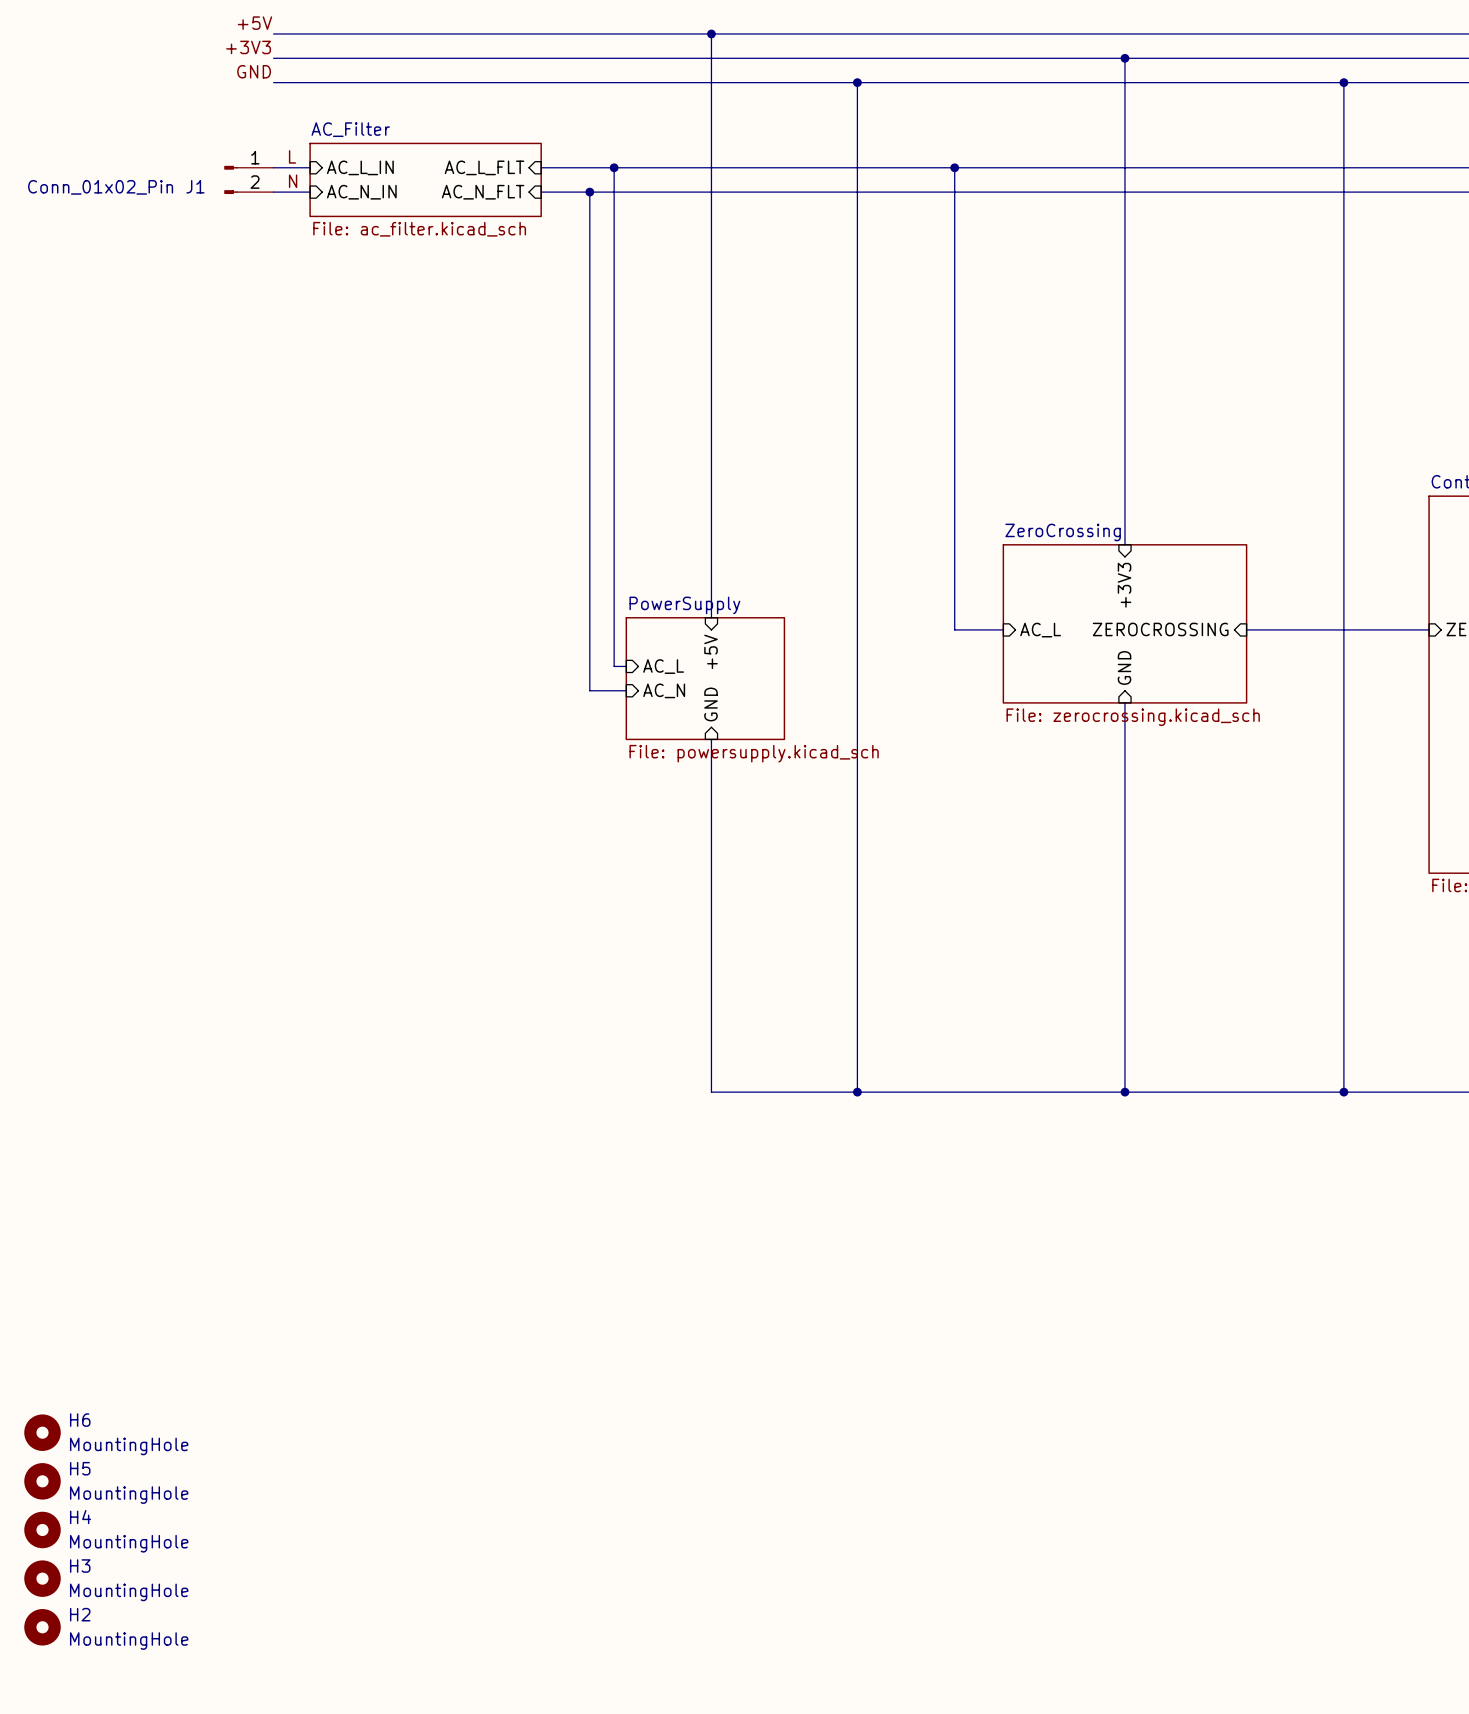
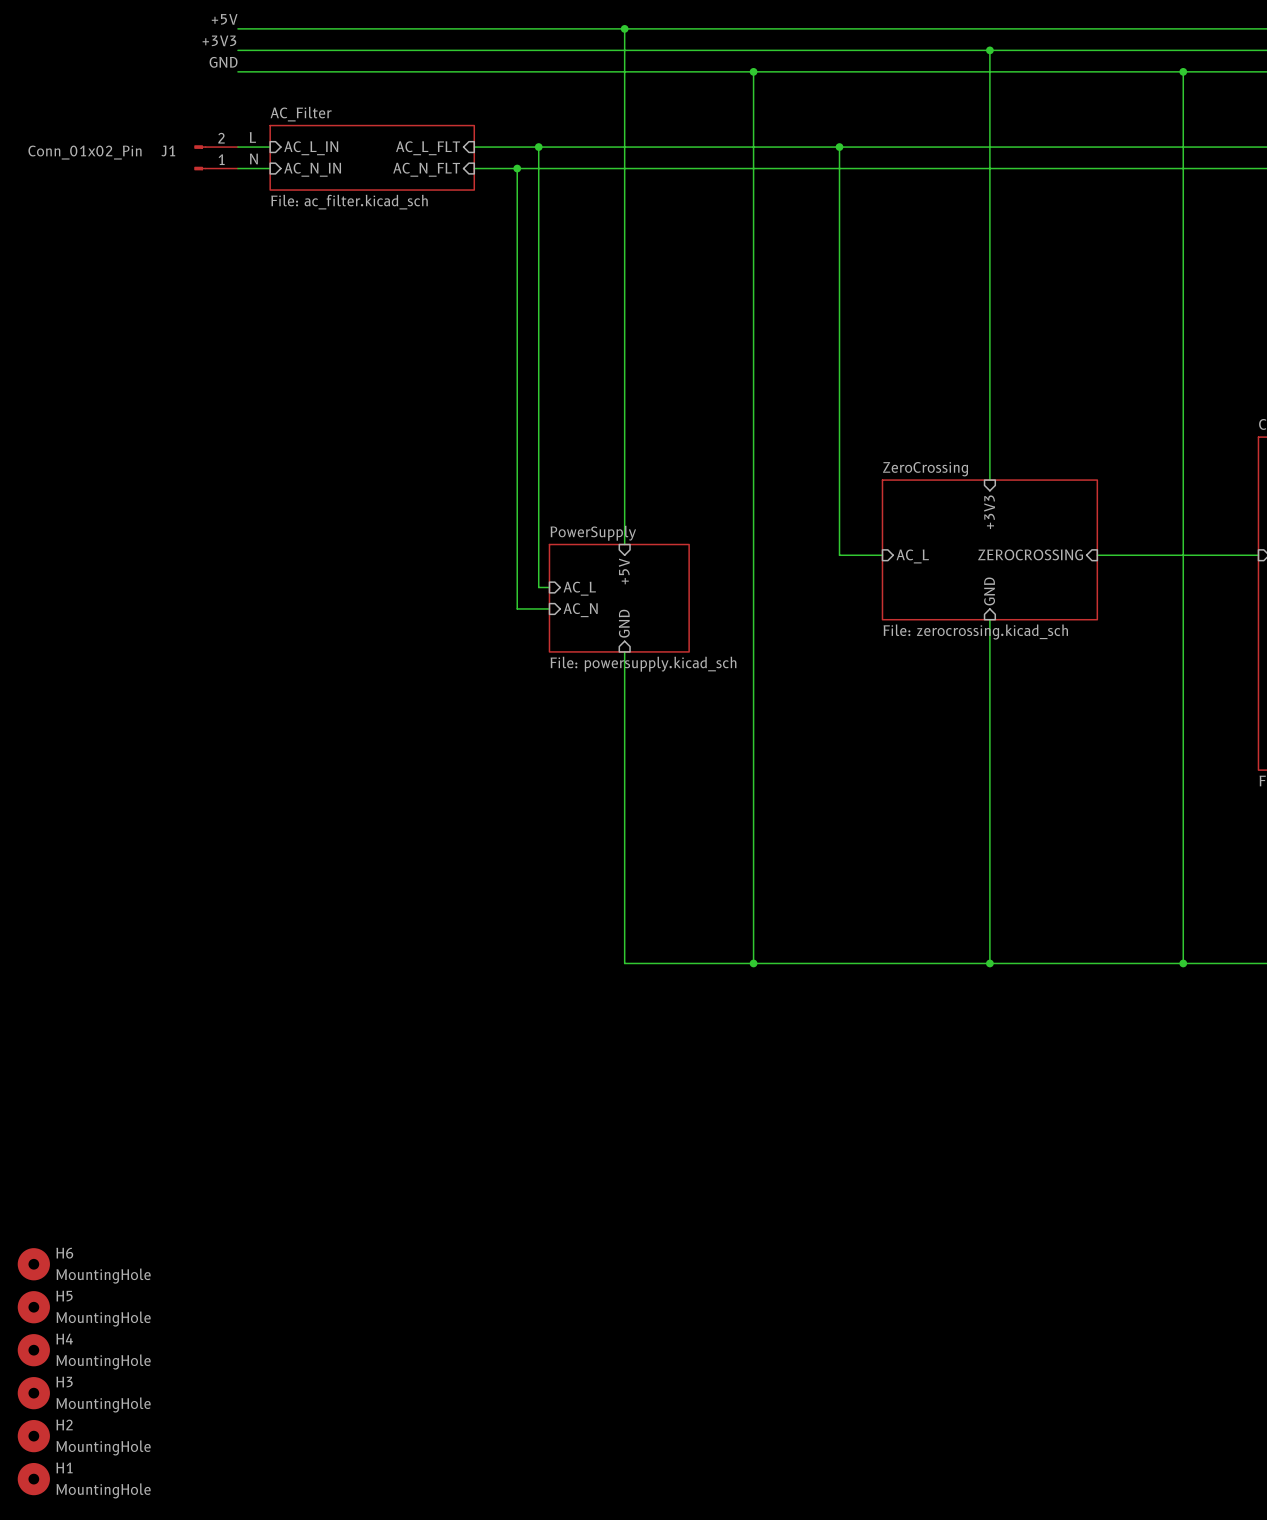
J1 flip: as is (231, 179) -> up-down (200, 157)
H1: none -> MountingHole (33, 1479)

